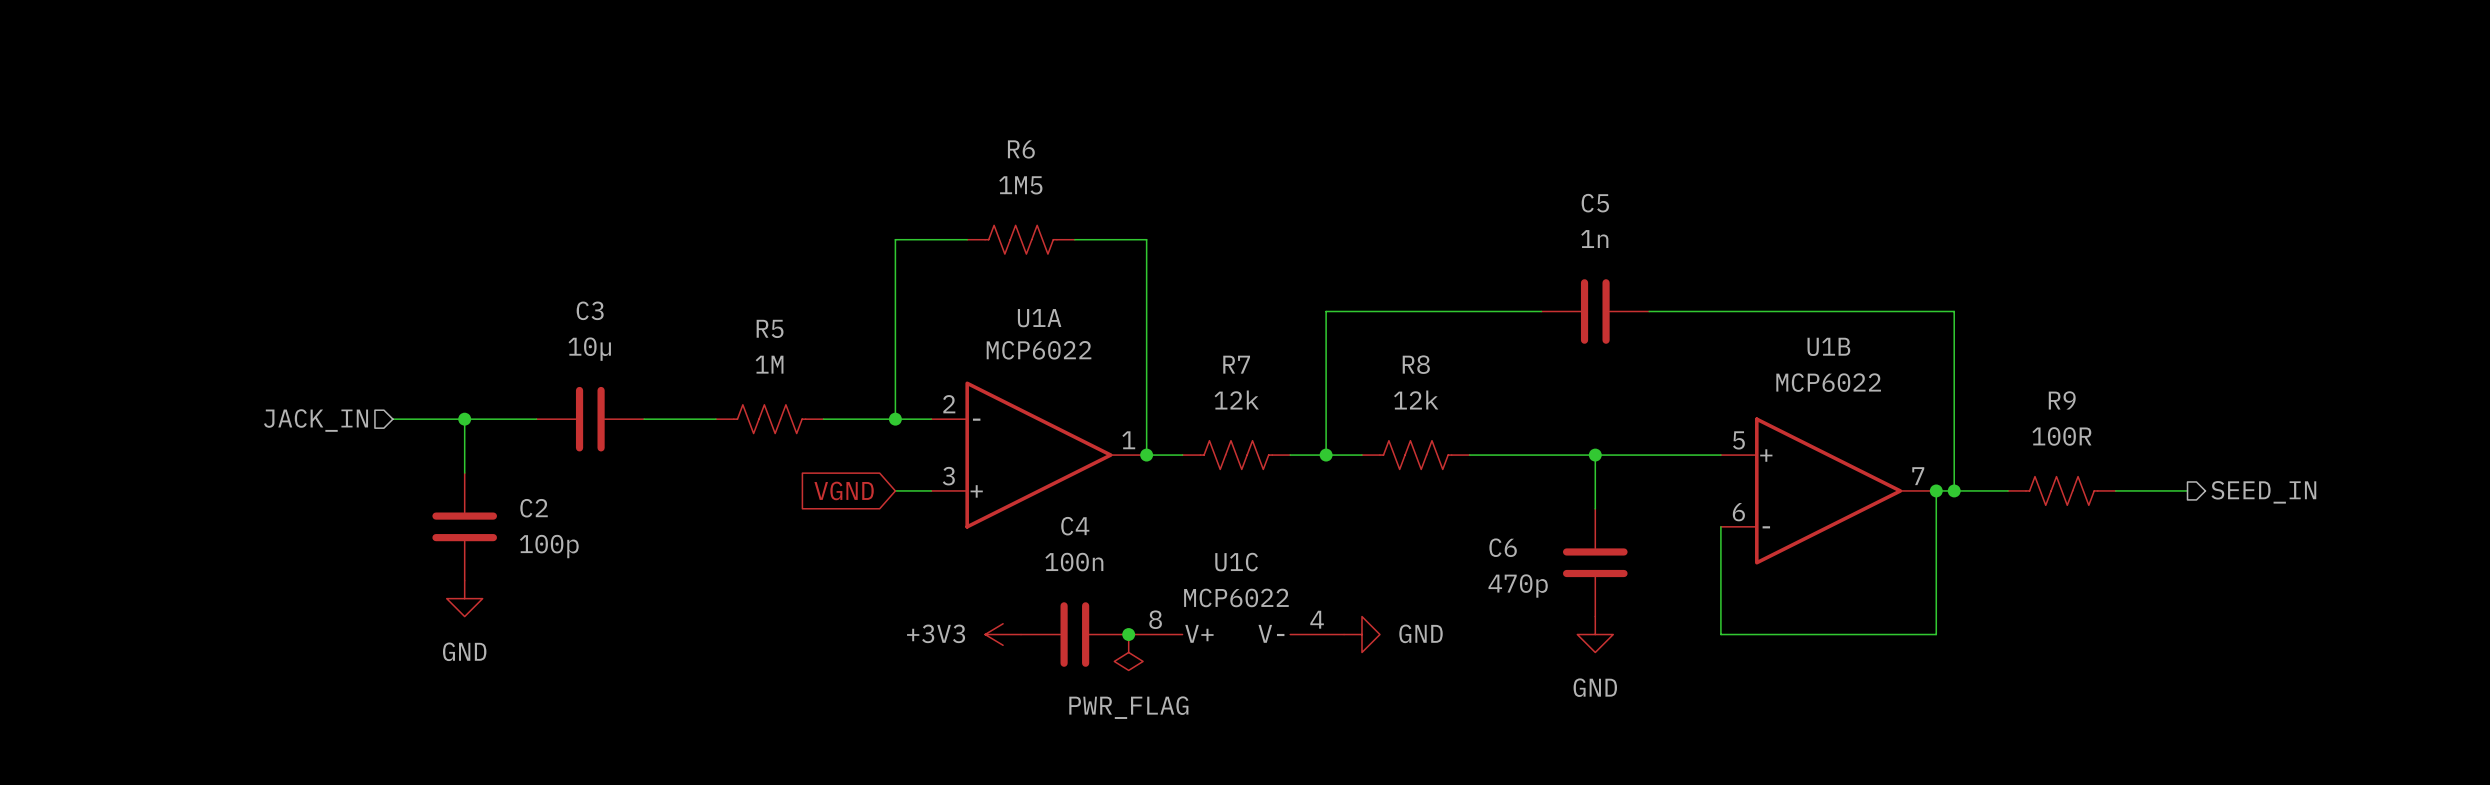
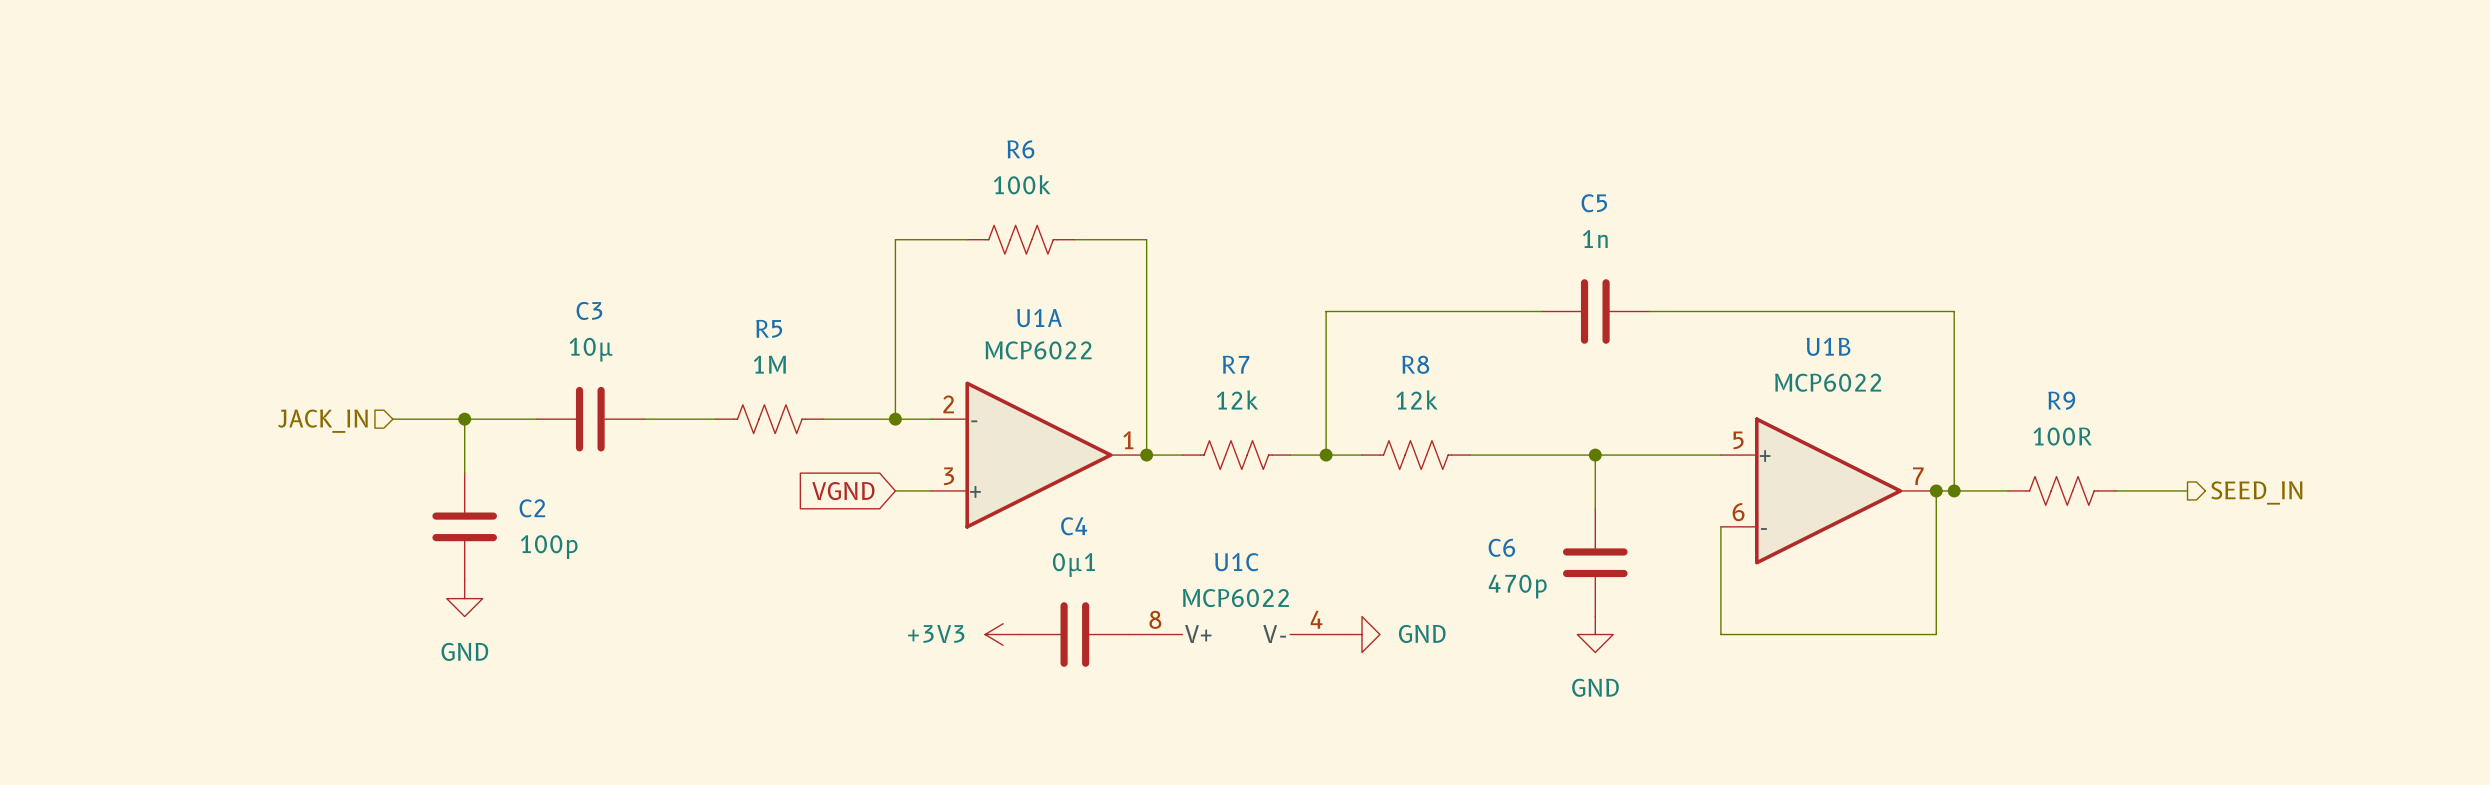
R6 value: 1M5 (1020, 185) -> 100k (1022, 184)
C4 value: 100n (1074, 562) -> 0µ1 (1073, 565)
junction: (1128, 634) -> none
power symbol: PWR_FLAG (1128, 652) -> none

